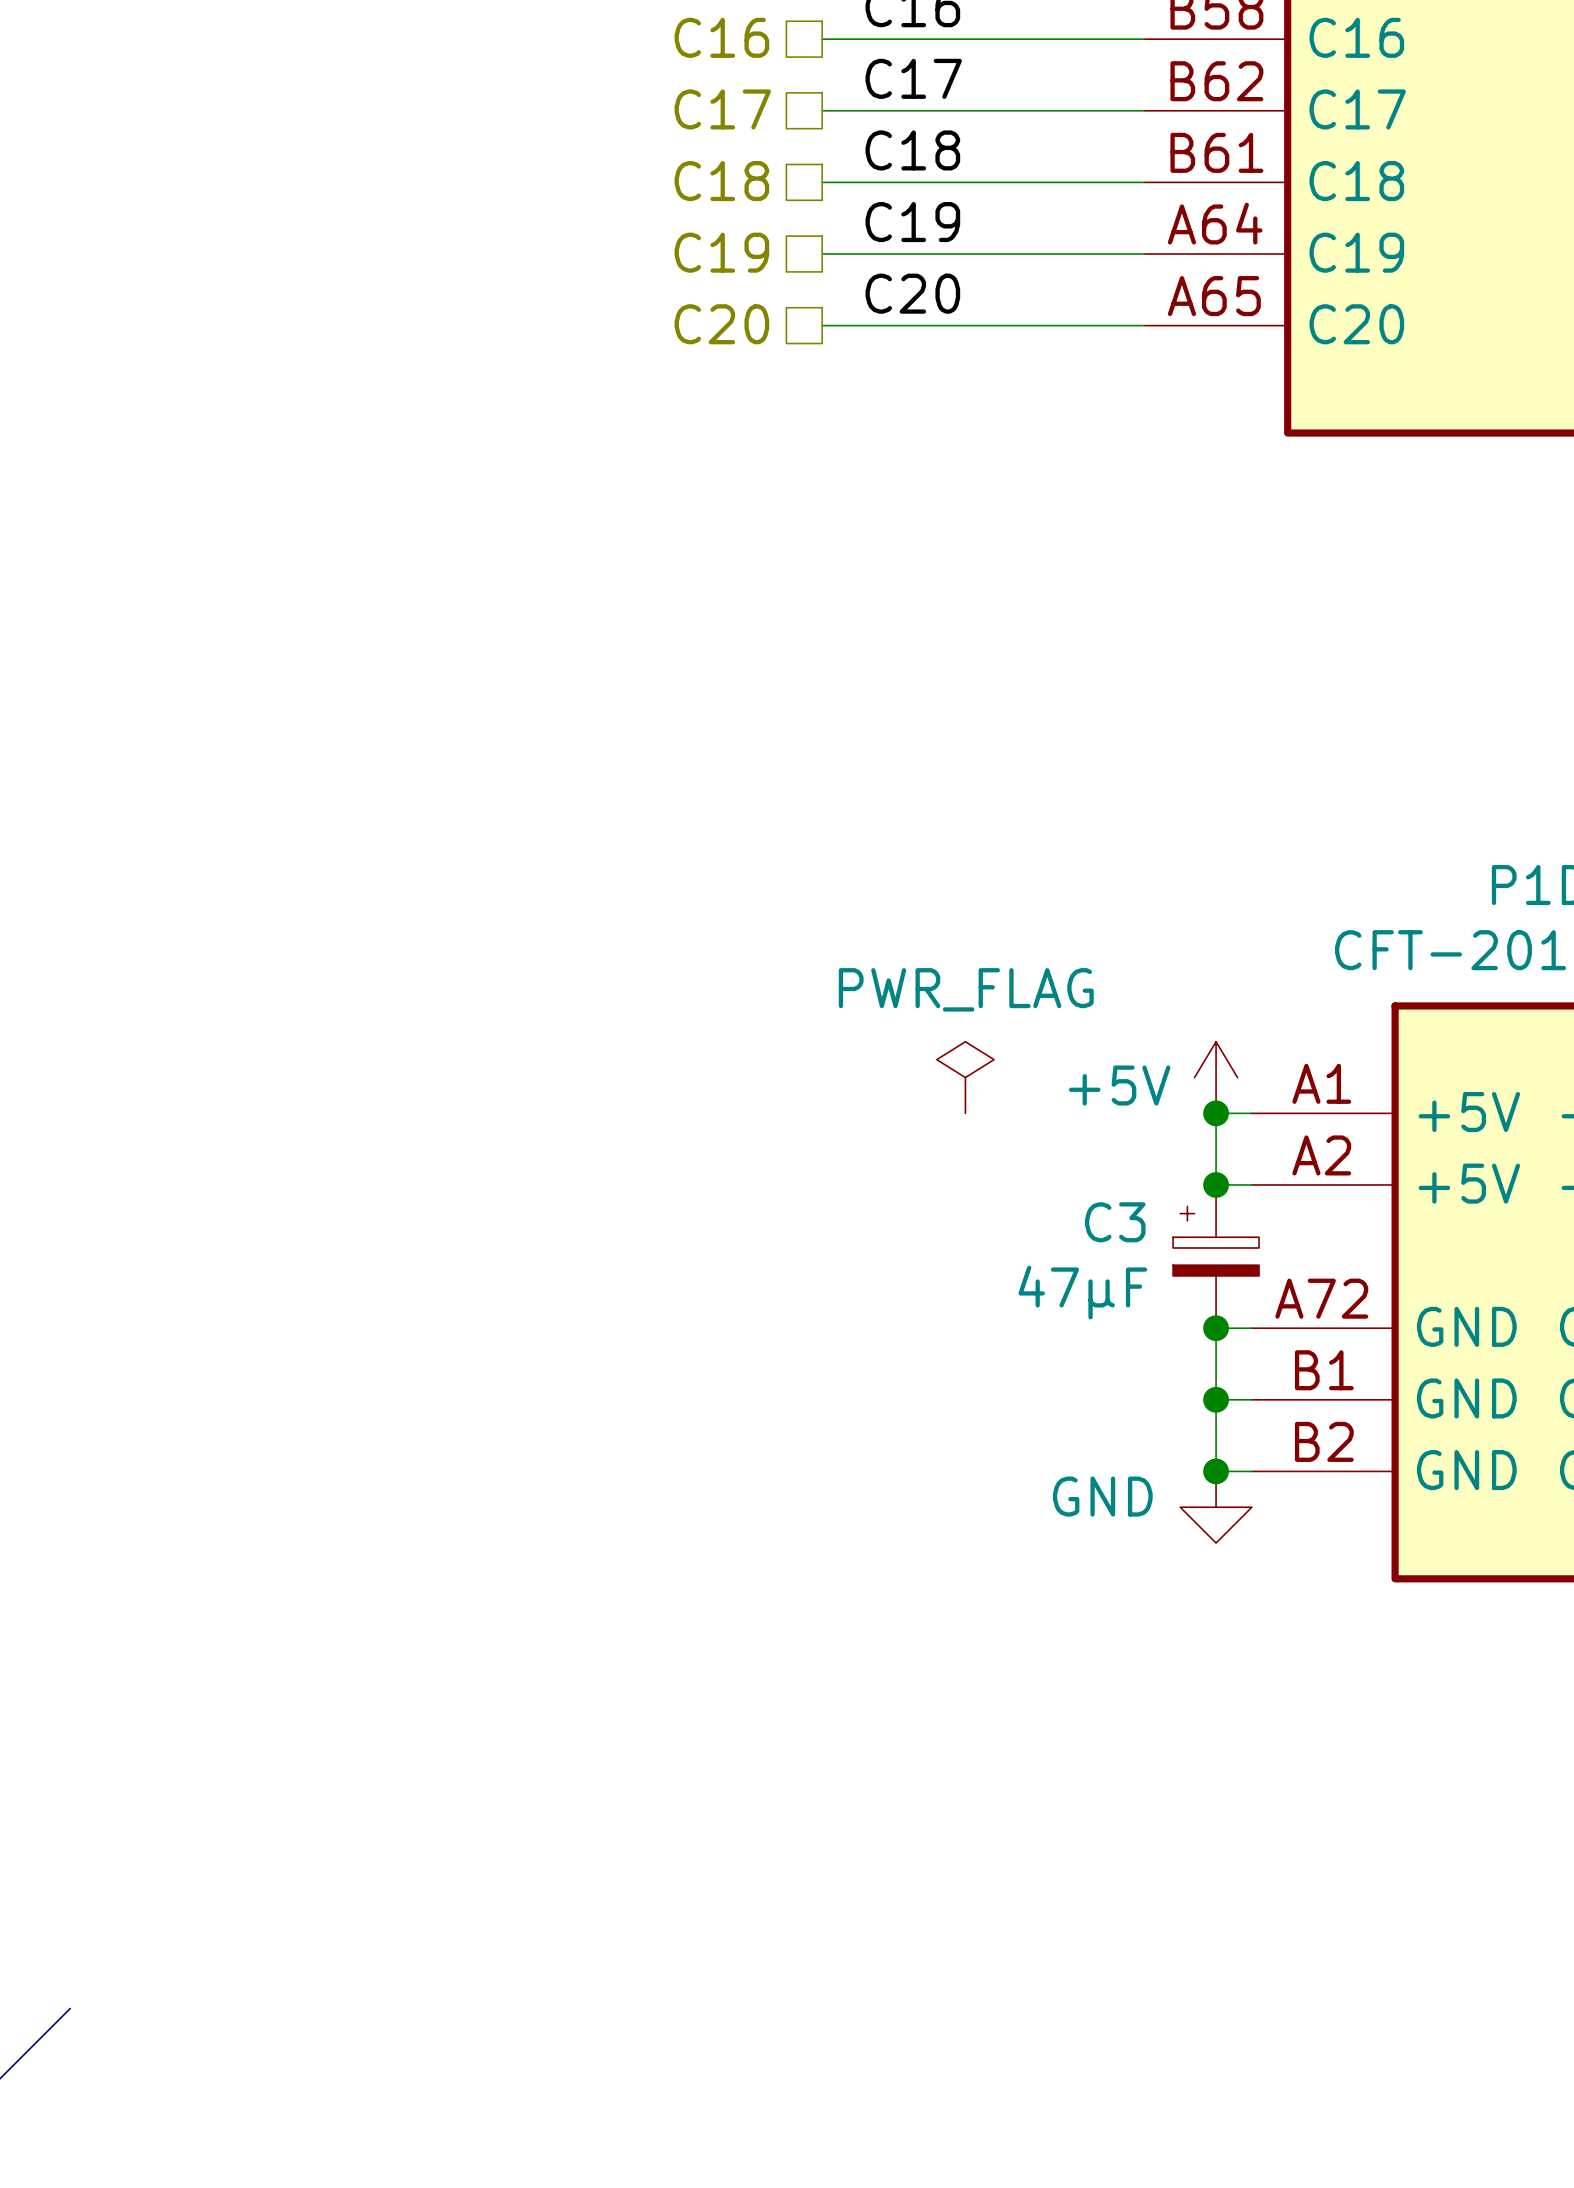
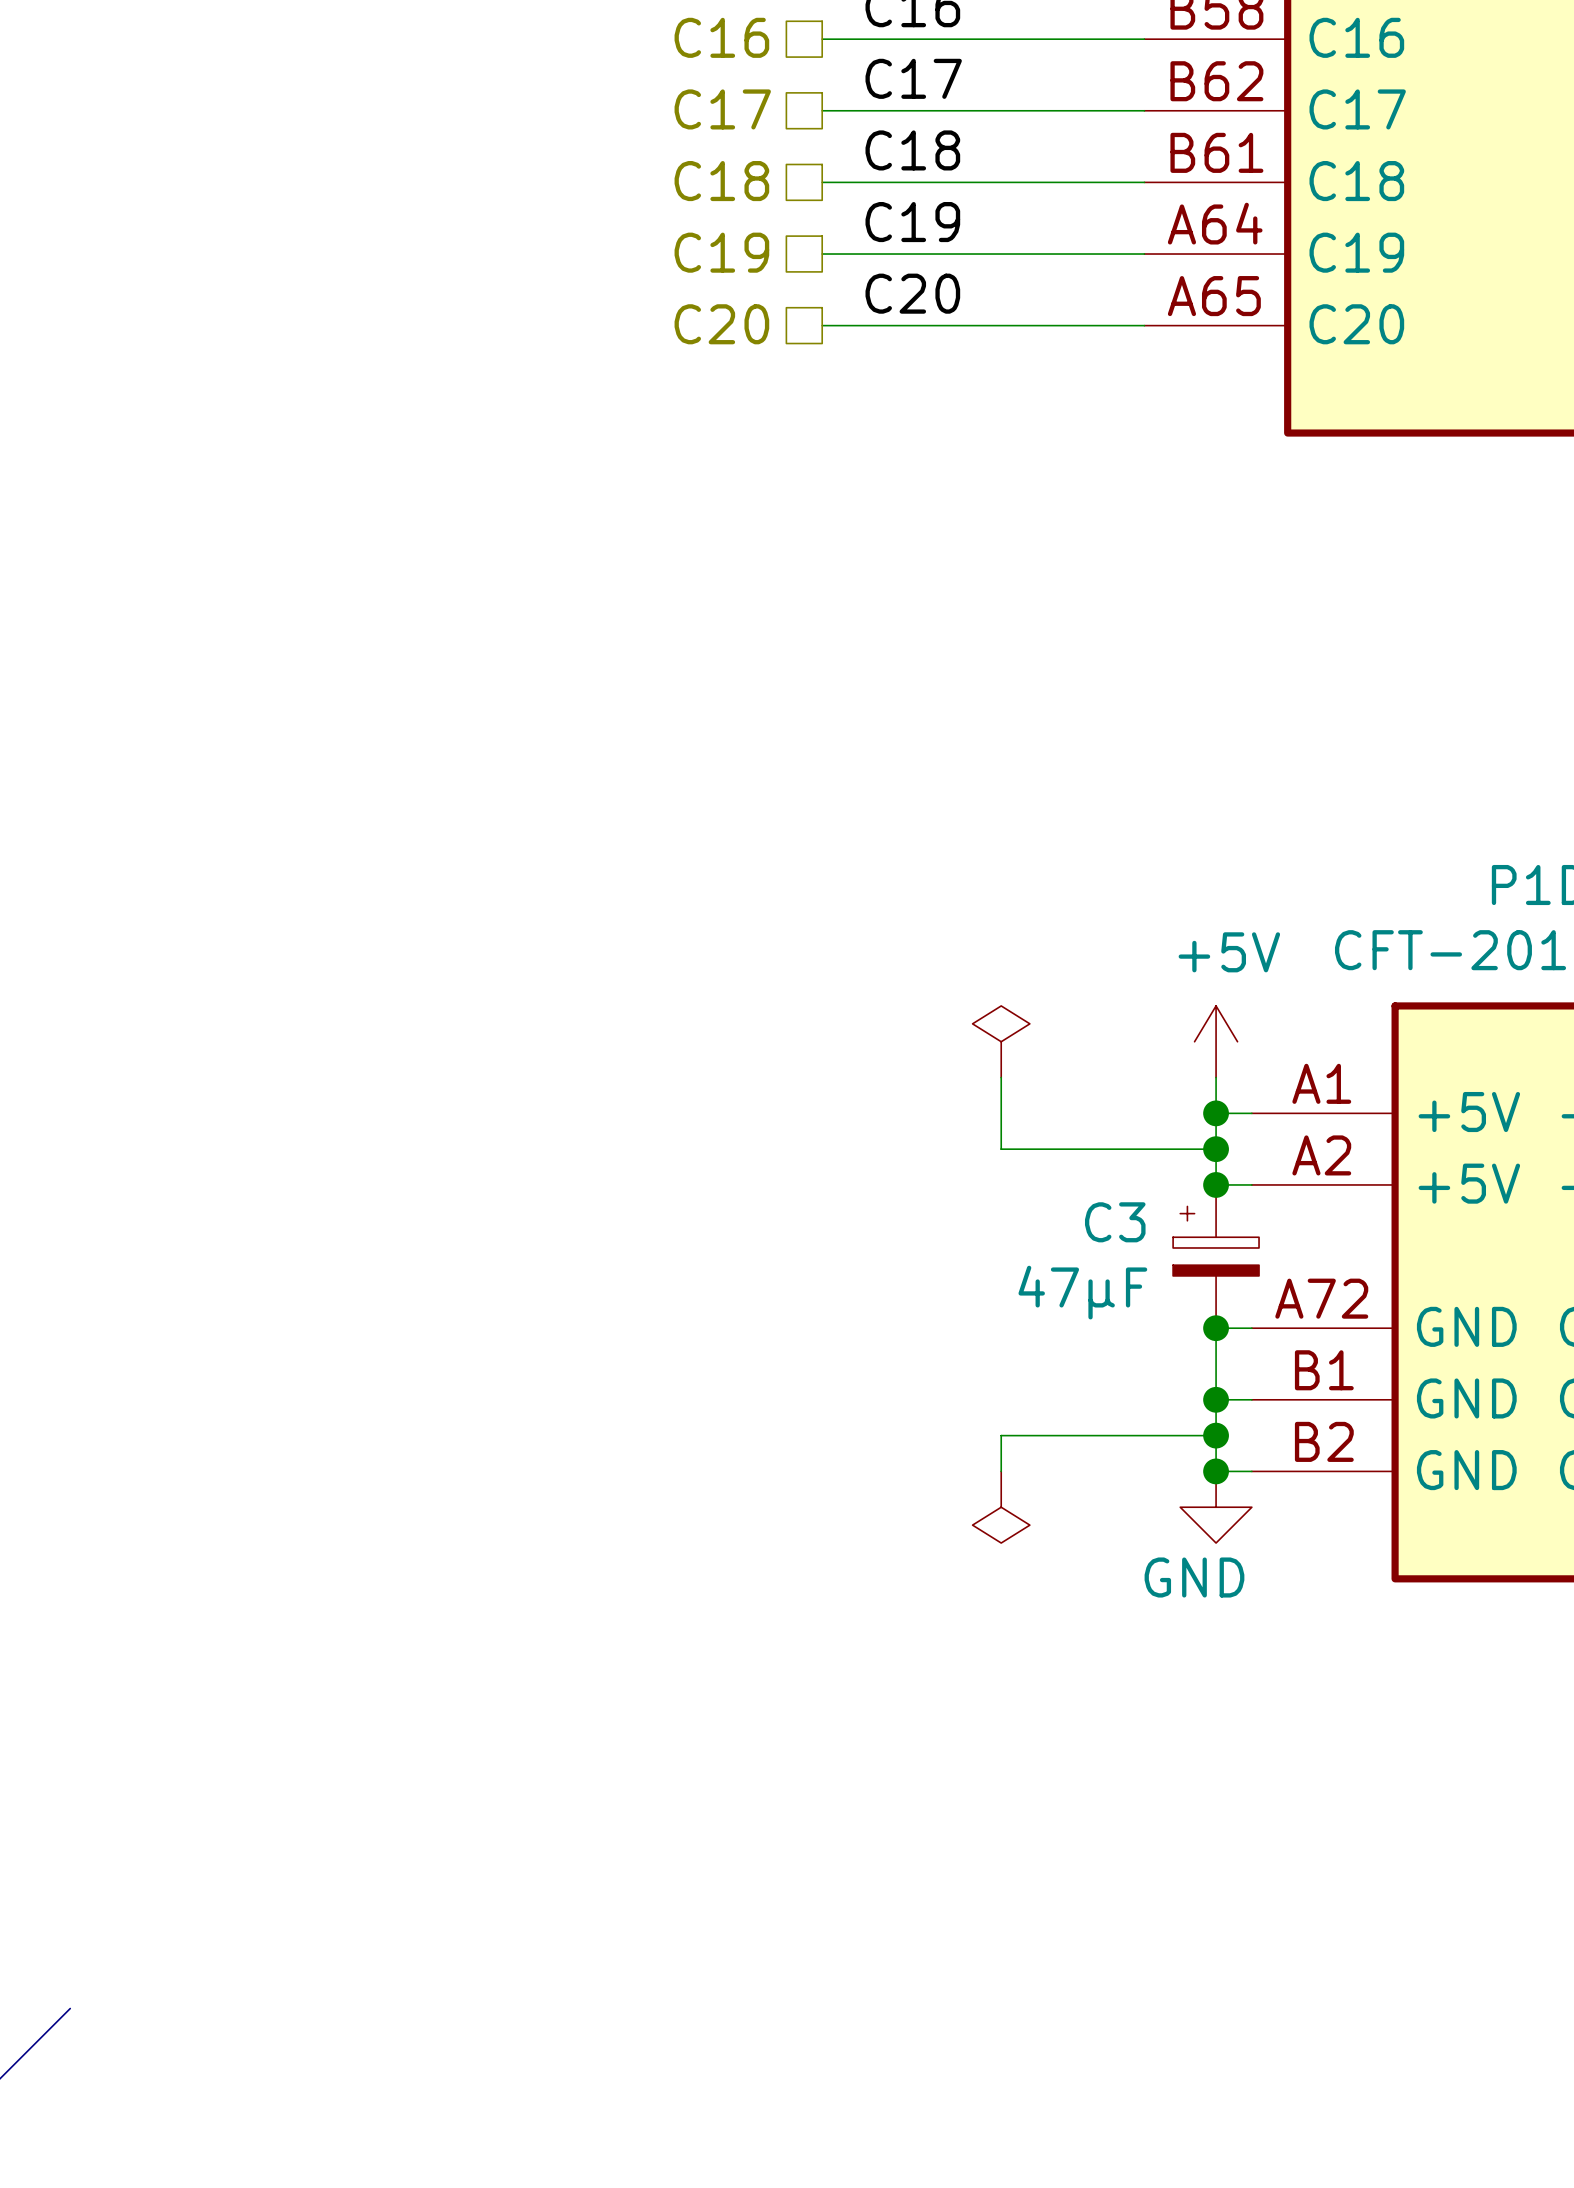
power symbol: none -> (1001, 1041)
power symbol: PWR_FLAG (965, 1077) -> none
wire: none -> (1001, 1077) (1001, 1149) (1216, 1149)
power symbol position: +5V (1216, 1077) -> +5V (1216, 1041)
power symbol text position: +5V (1119, 1085) -> +5V (1229, 952)
junction: none -> (1216, 1149)
wire: none -> (1216, 1435) (1001, 1435) (1001, 1471)
junction: none -> (1216, 1435)
power symbol text position: GND (1102, 1496) -> GND (1194, 1577)
power symbol: none -> (1001, 1507)

